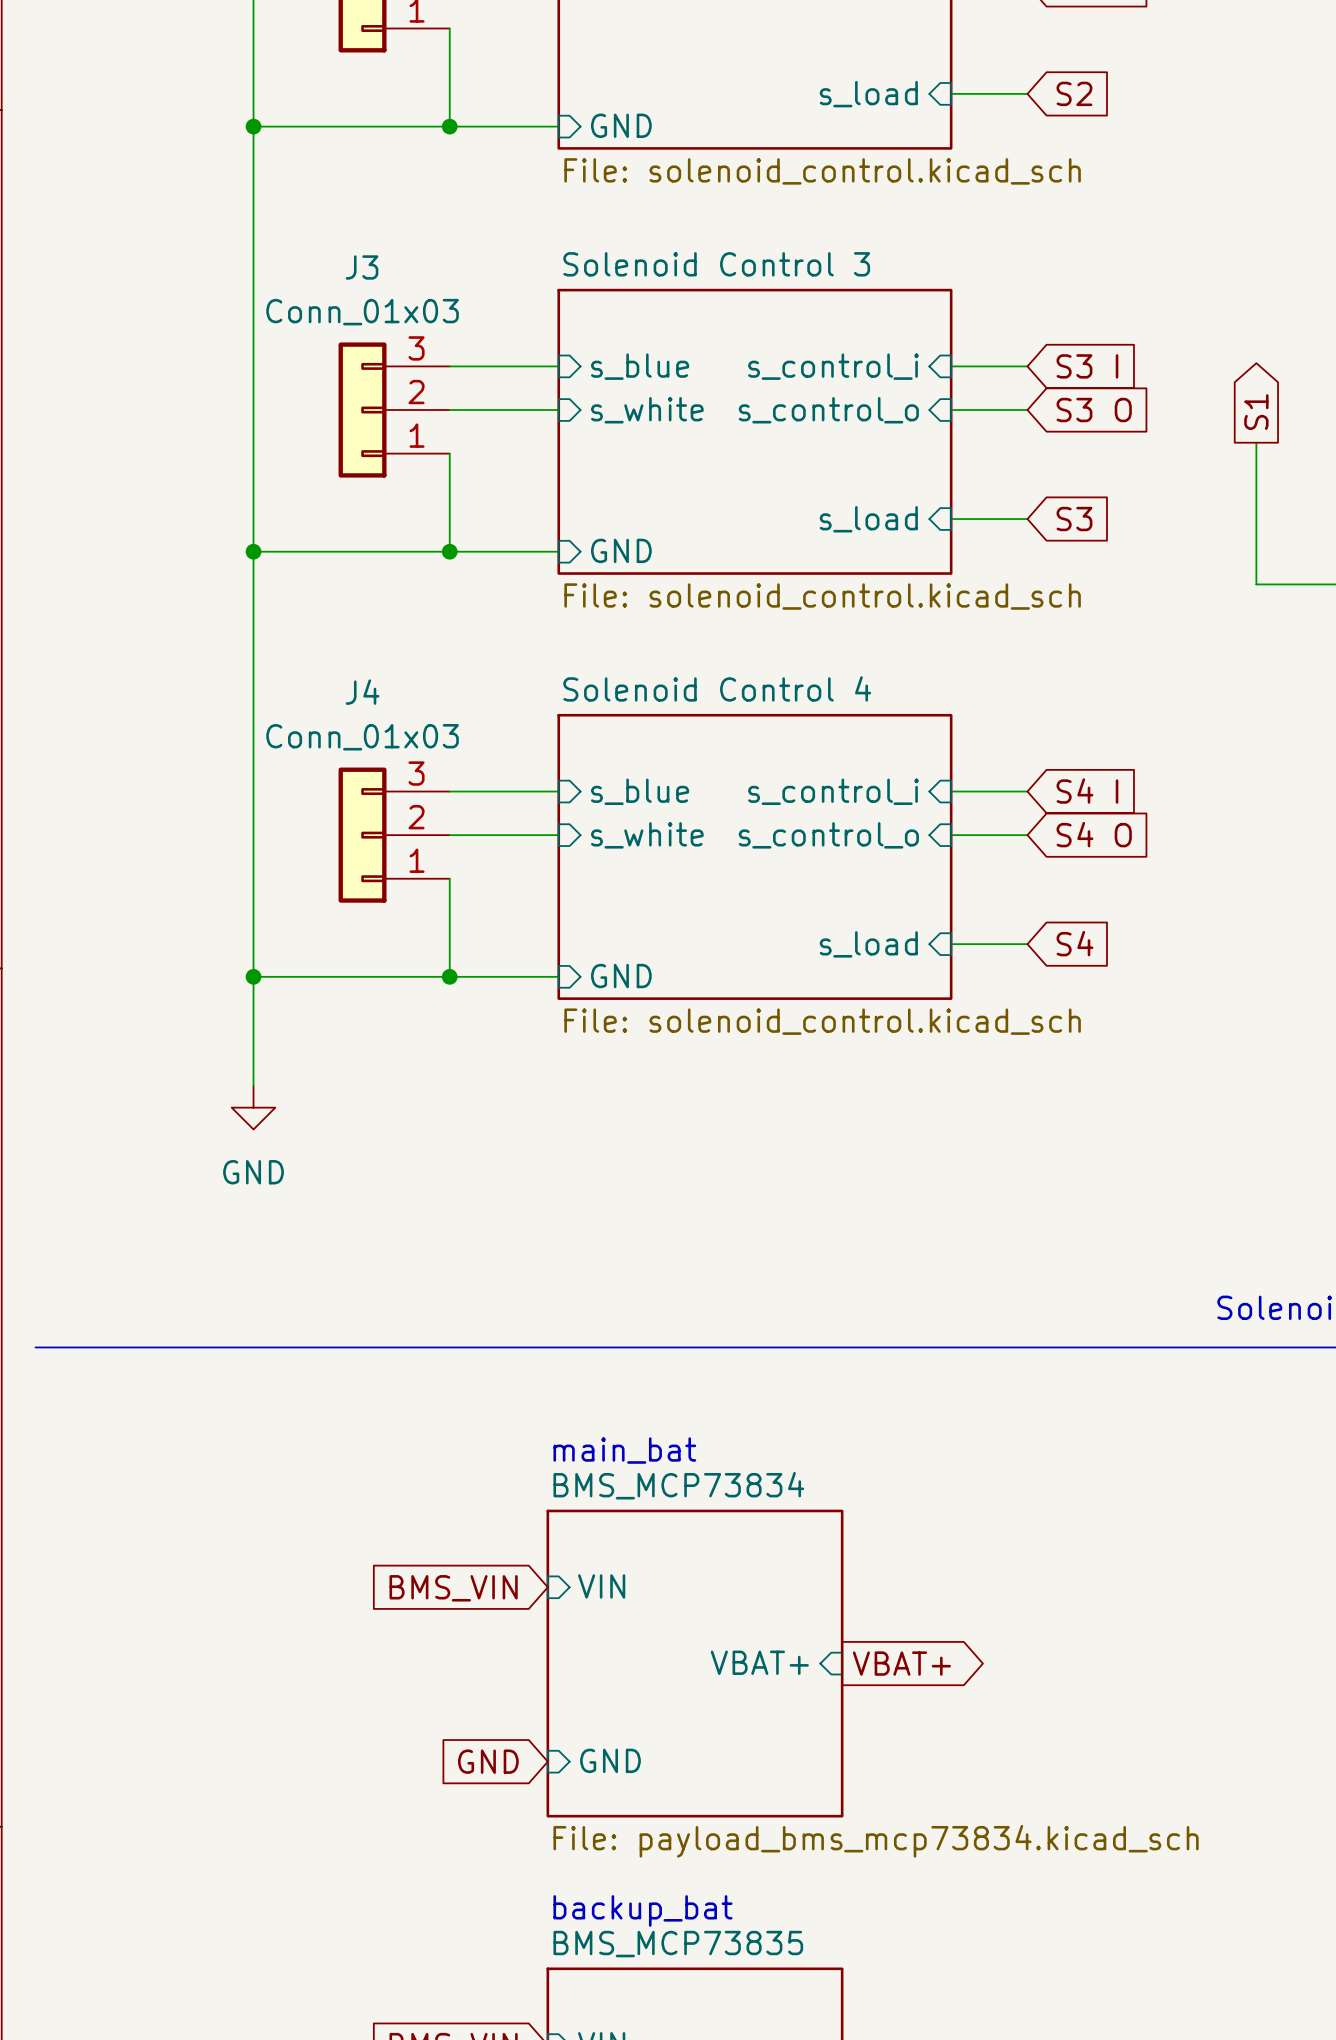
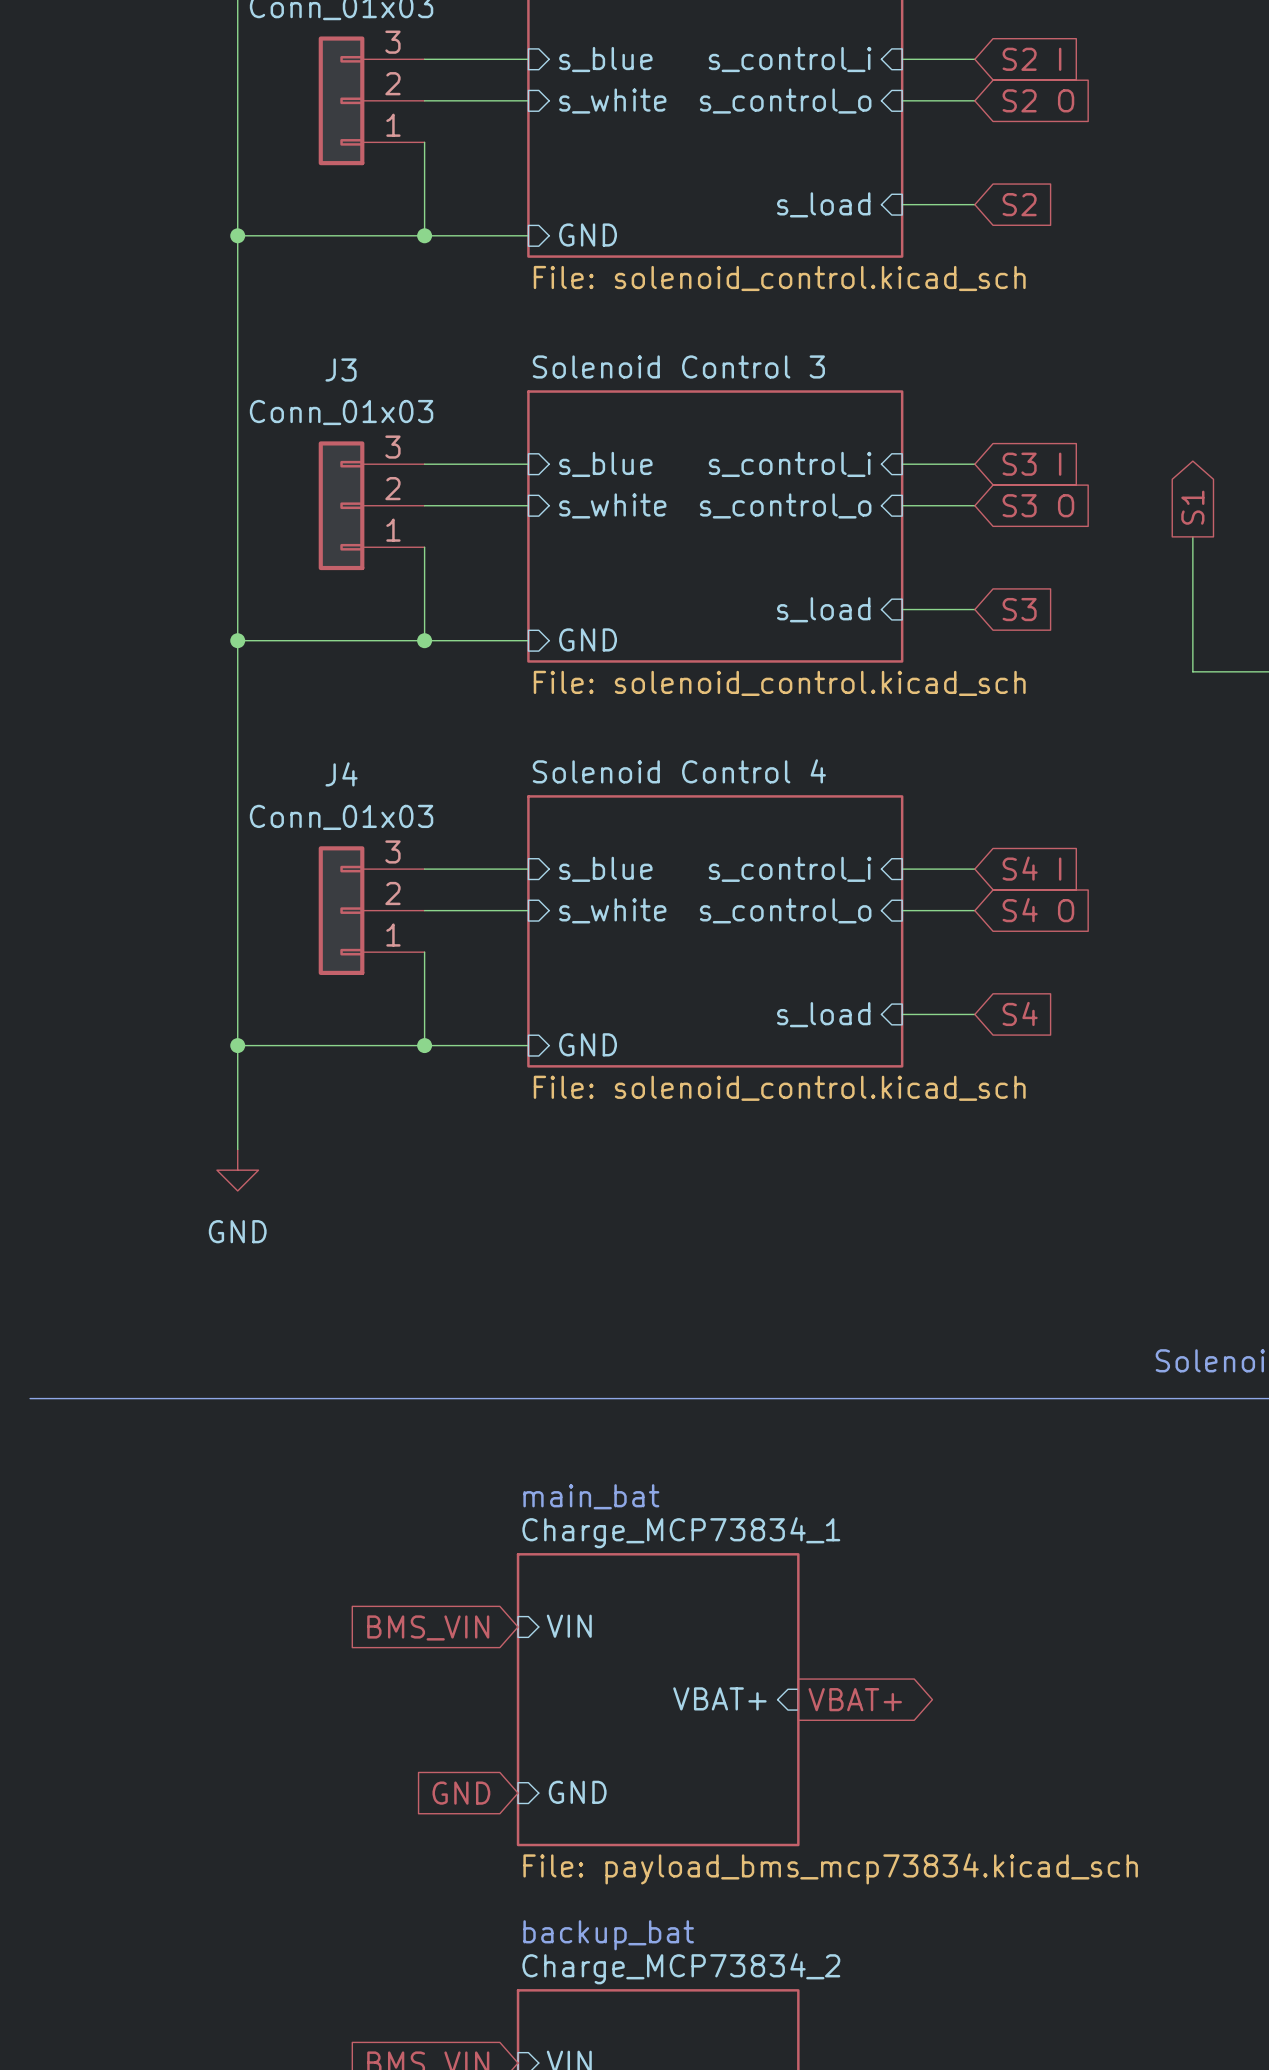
sheet BMS_MCP73834 name: BMS_MCP73834 (678, 1485) -> Charge_MCP73834_1 (681, 1532)
sheet BMS_MCP73835 name: BMS_MCP73835 (678, 1944) -> Charge_MCP73834_2 (681, 1968)

